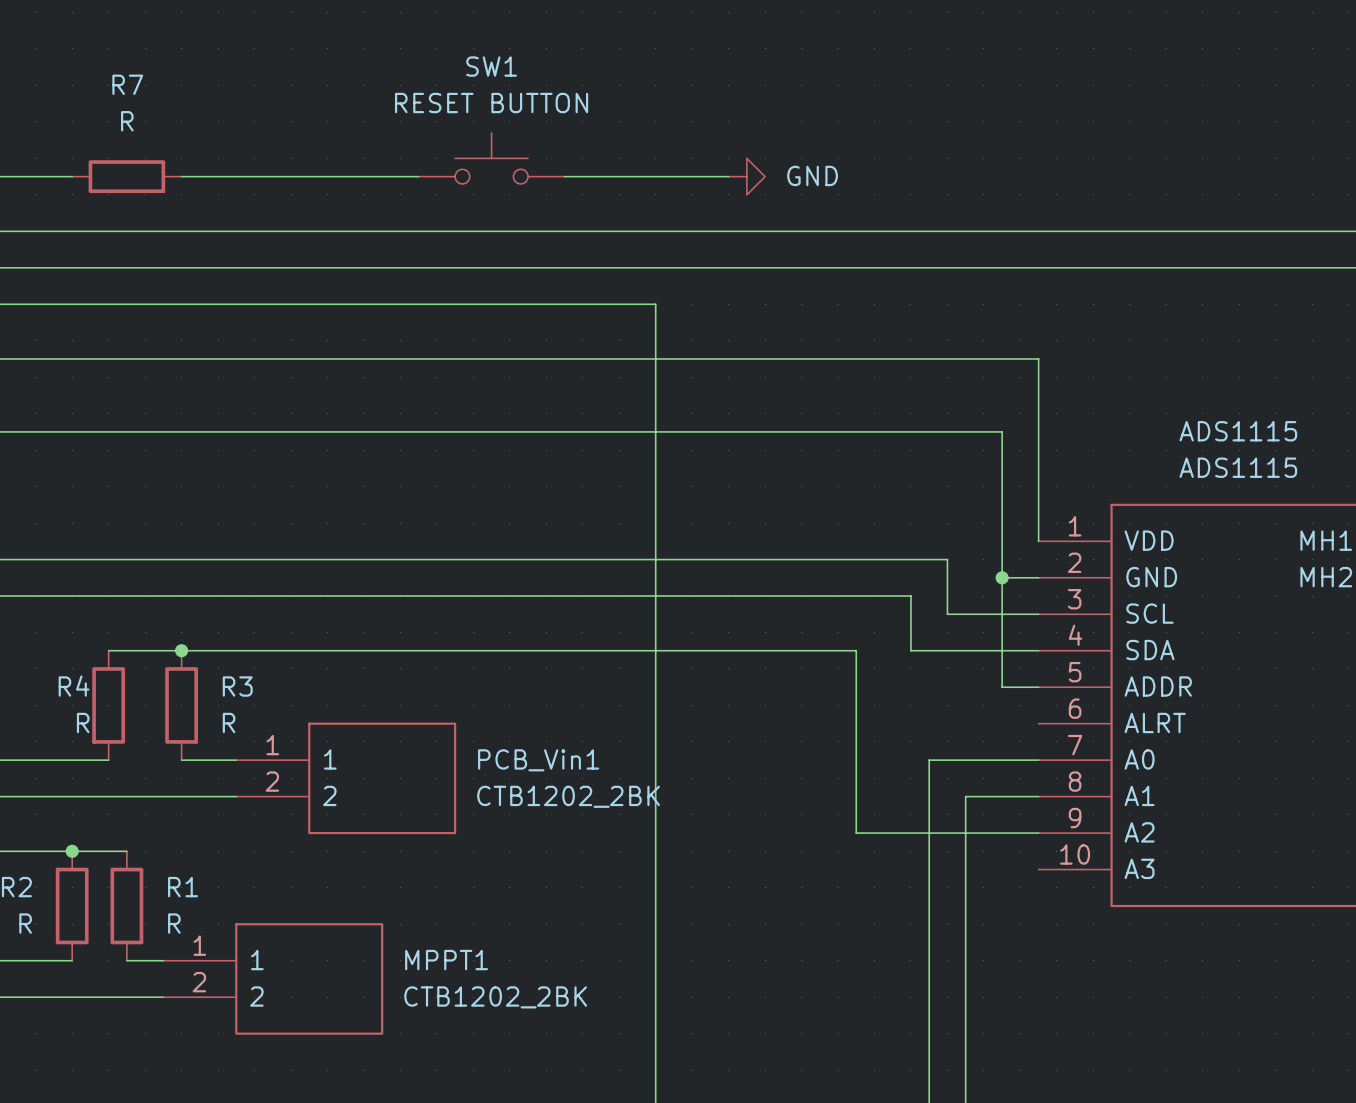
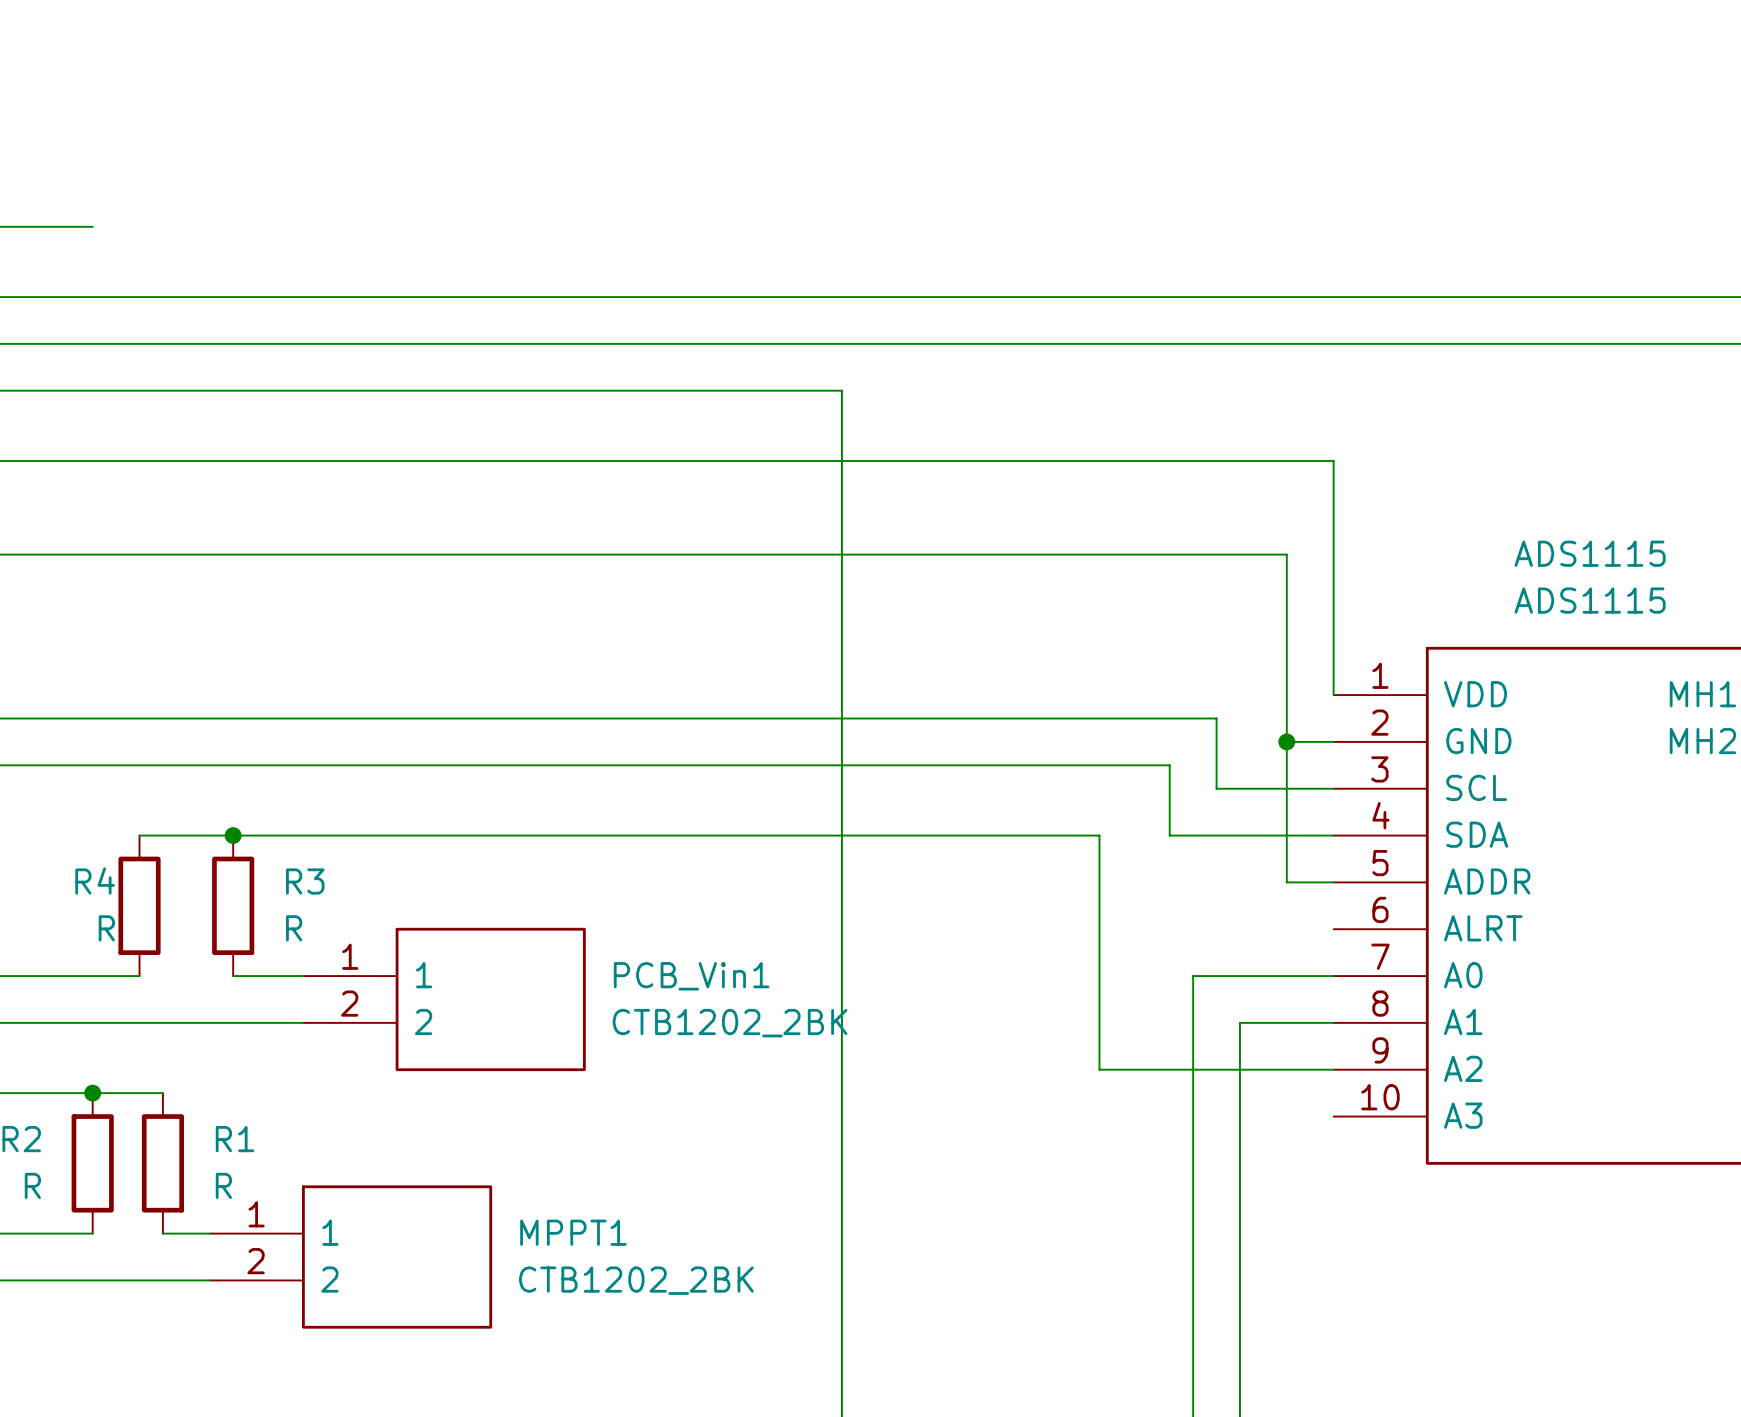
SW1: RESET BUTTON (491, 158) -> none
R7: R (126, 176) -> none
wire: (181, 176) (418, 176) -> none
wire: (564, 176) (728, 176) -> none
power symbol: GND (746, 176) -> none

